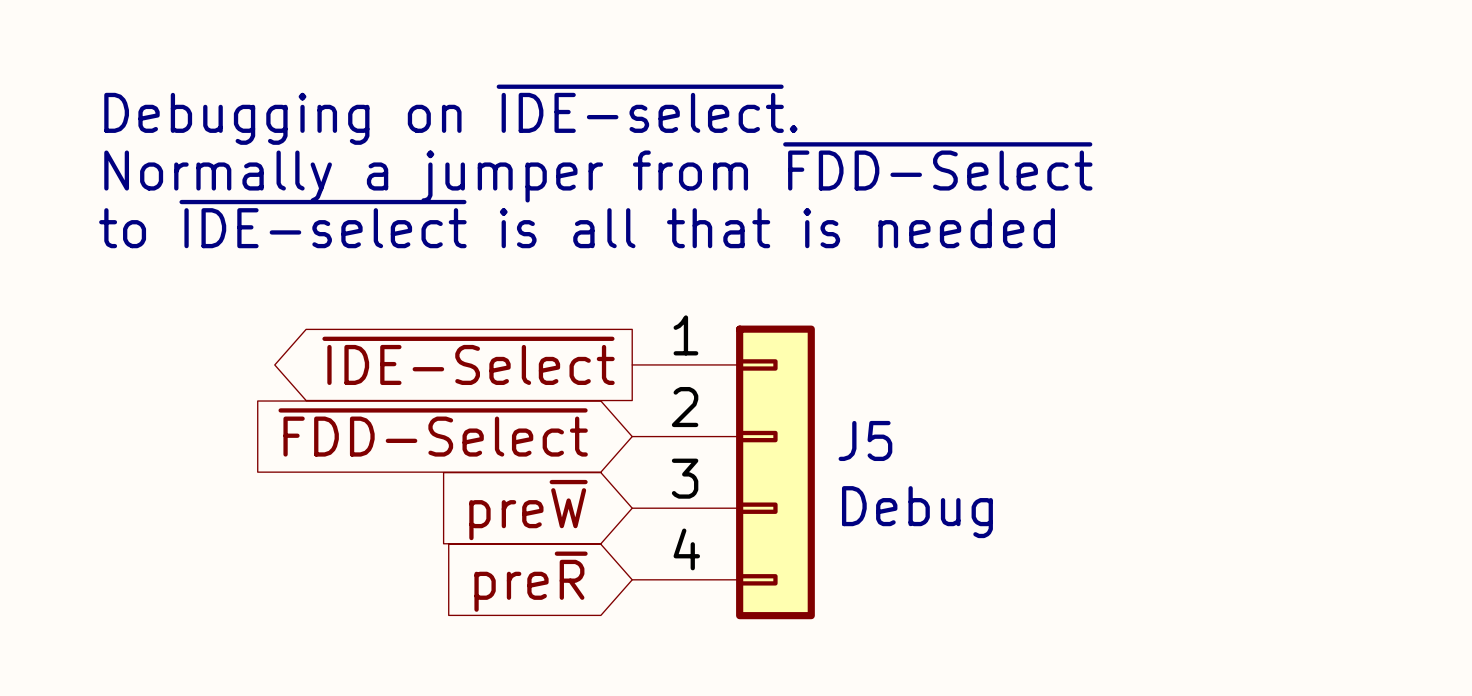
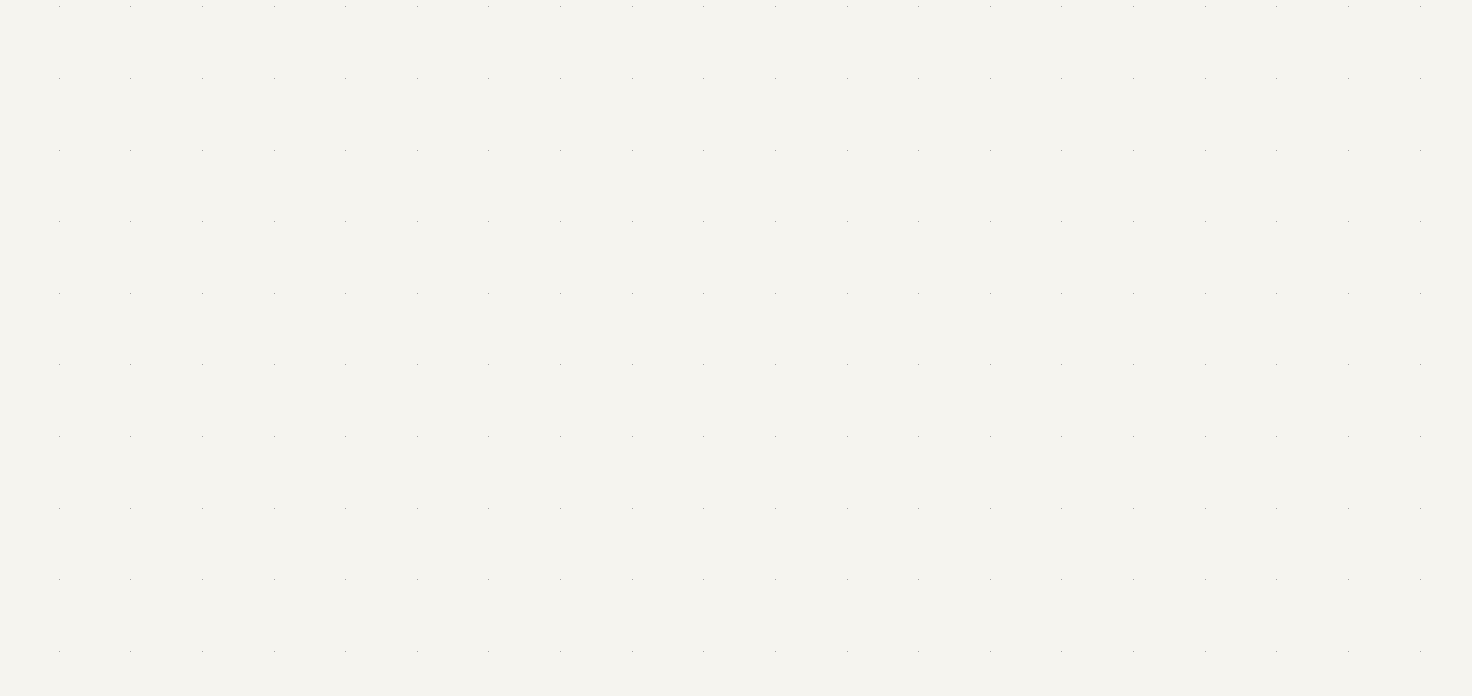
text: Debugging on ~{IDE-select}. (450, 114) -> none
text: Normally a jumper from ~{FDD-Select} (598, 172) -> none
text: to ~{IDE-select} is all that is needed (577, 224) -> none
global label: ~{IDE-Select} (468, 360) -> none
global label: ~{FDD-Select} (433, 432) -> none
J5: Debug (723, 472) -> none
global label: pre~{W} (528, 510) -> none
global label: pre~{R} (531, 581) -> none

